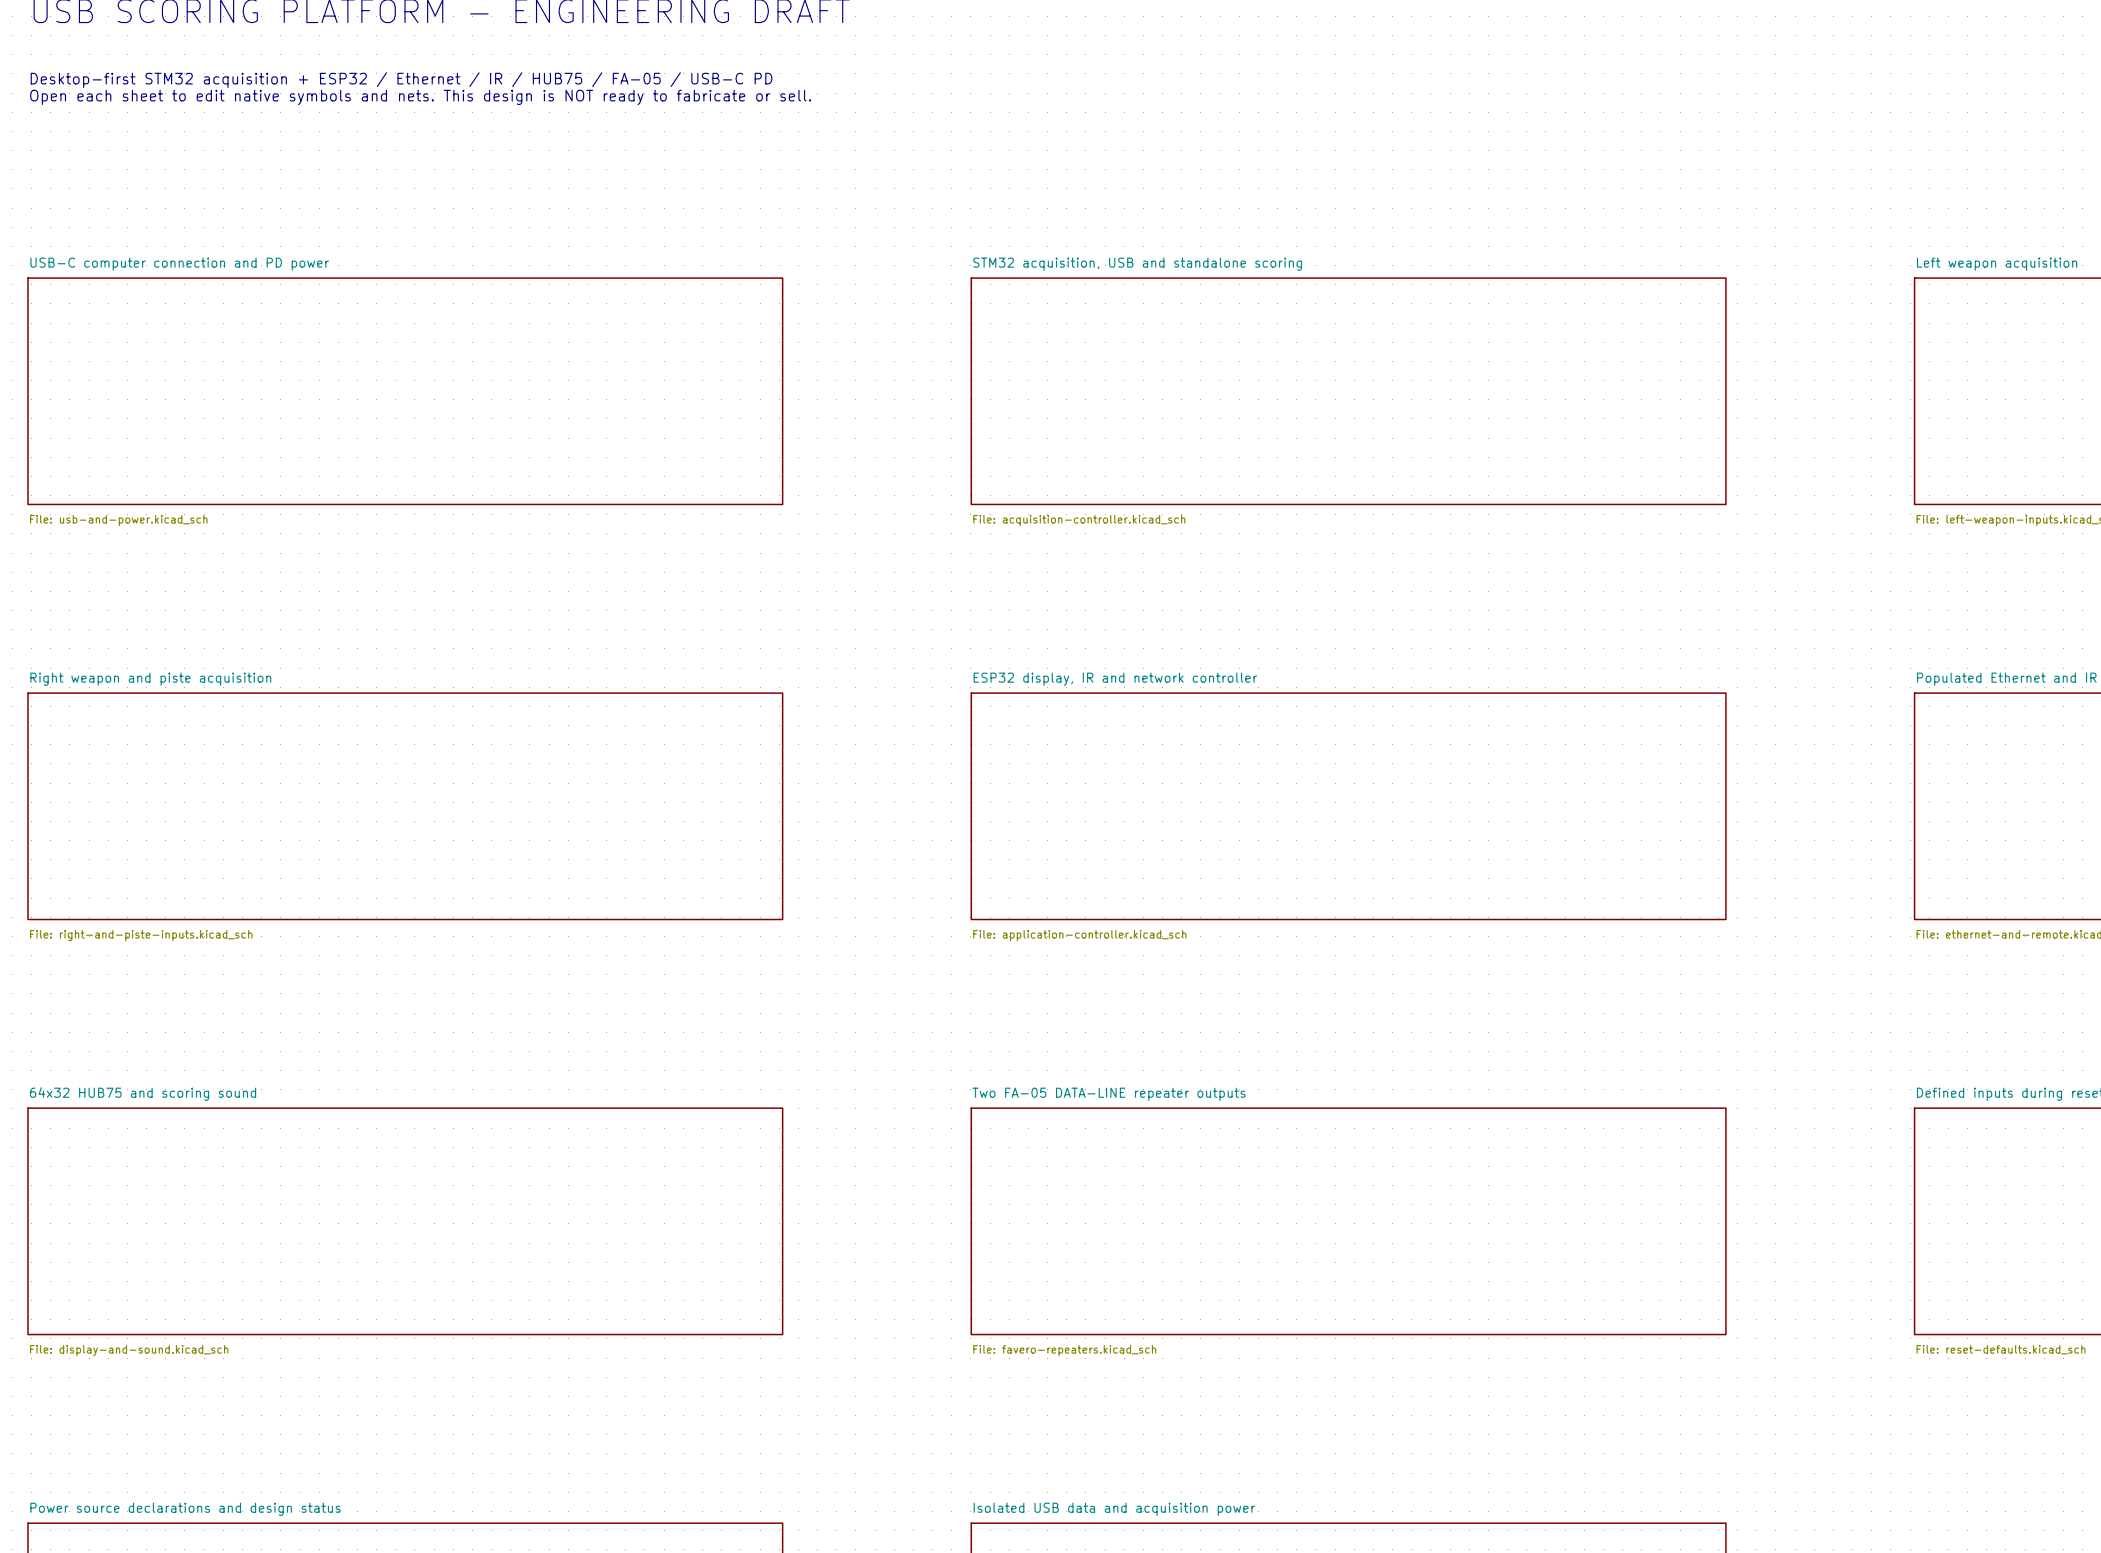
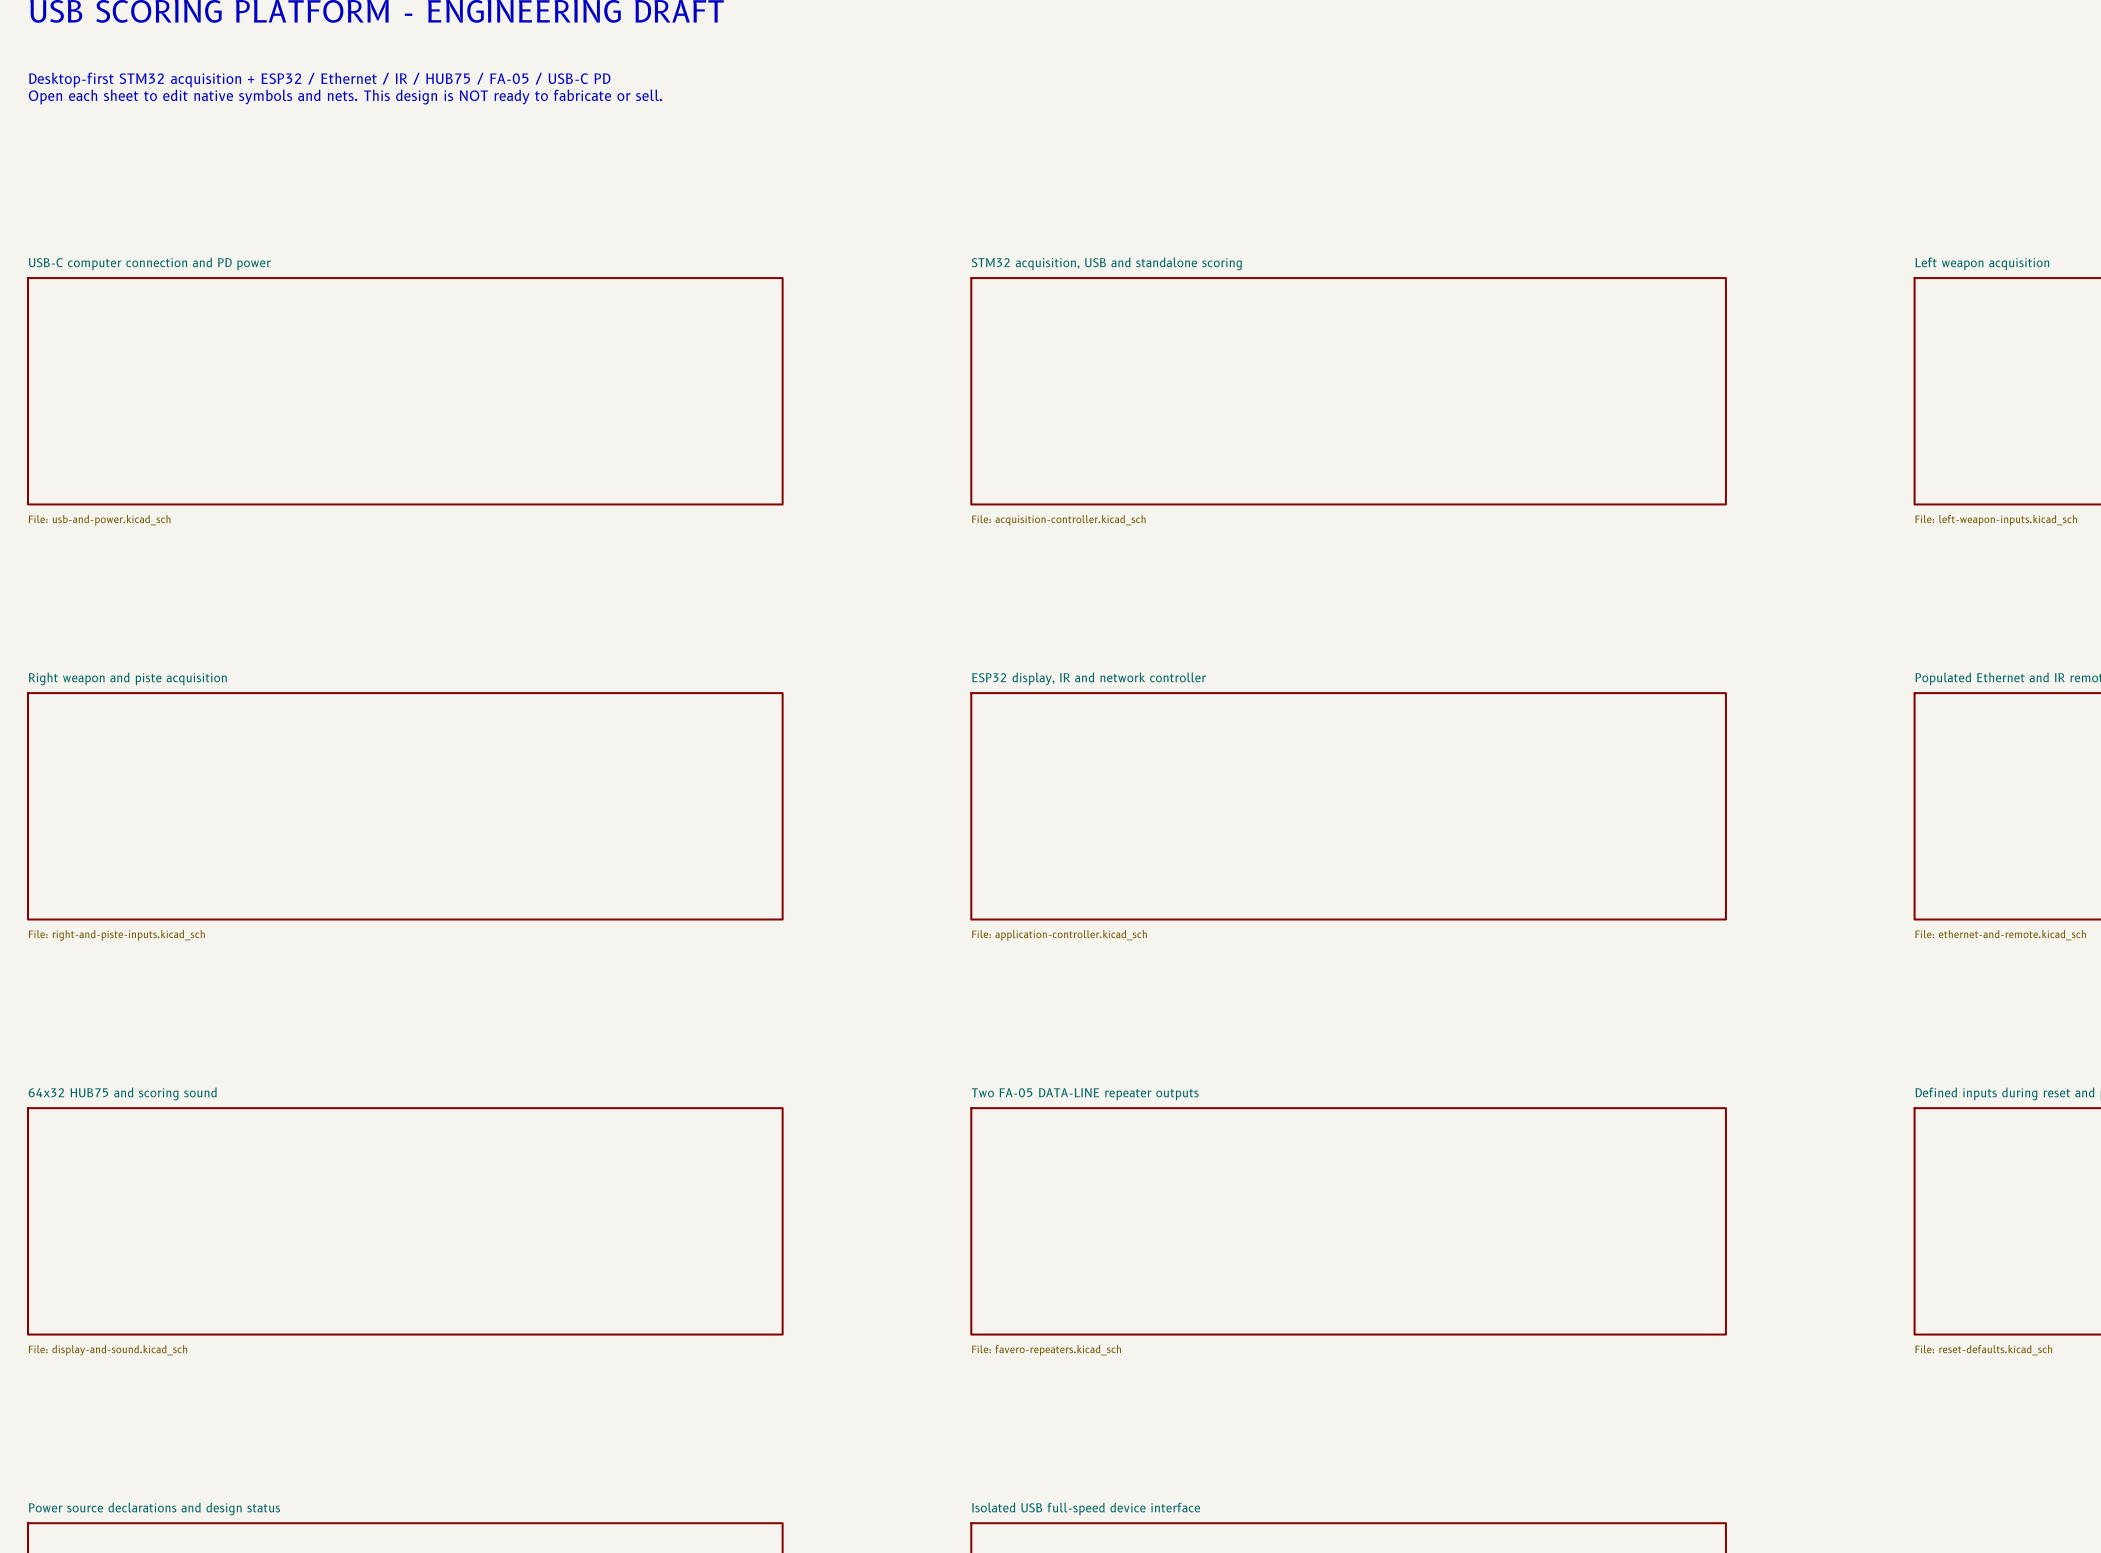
sheet Isolated USB data and acquisition power name: Isolated USB data and acquisition power (1114, 1509) -> Isolated USB full-speed device interface (1086, 1508)

